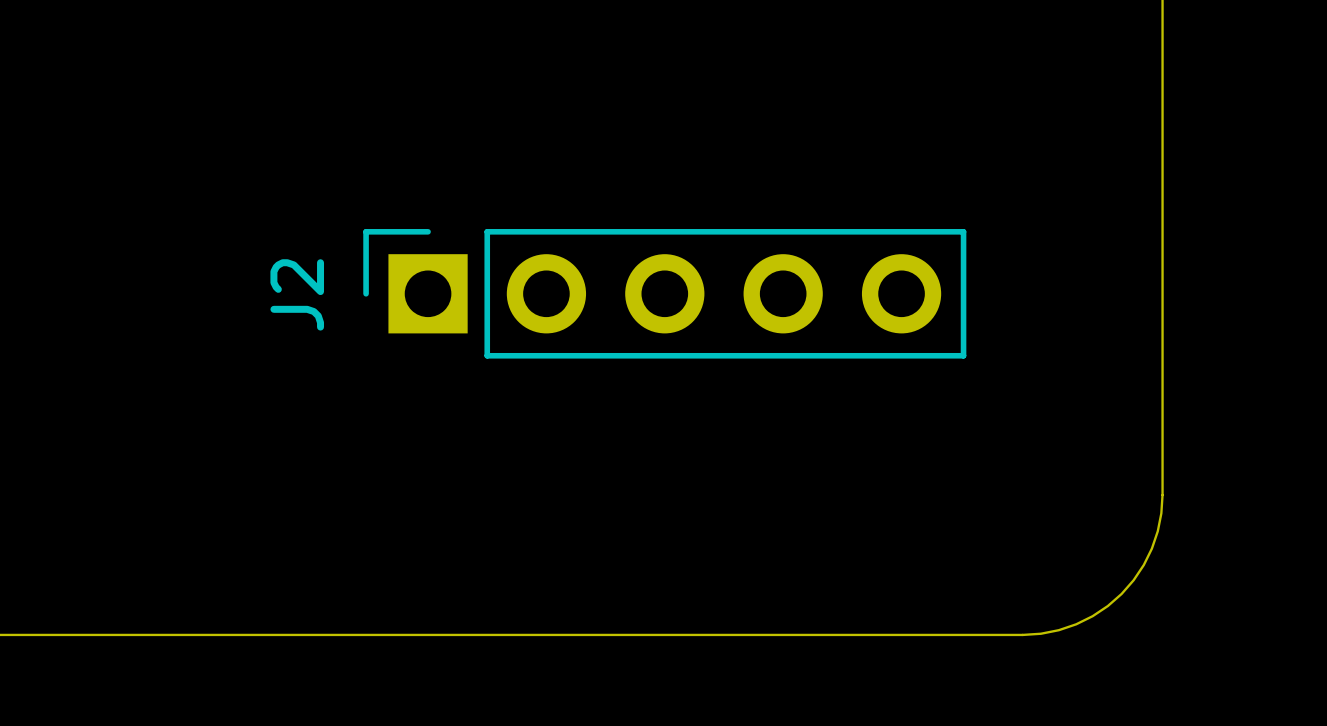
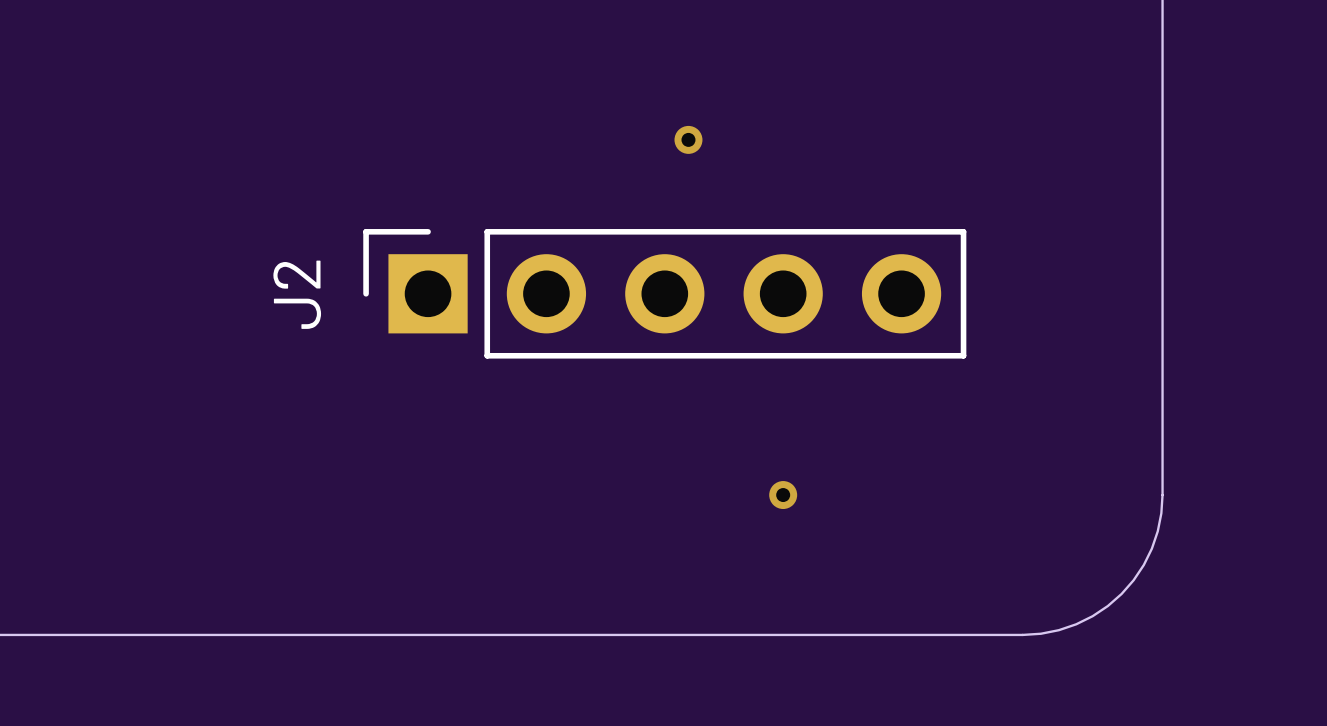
via: none -> (688, 139)
via: none -> (783, 495)

